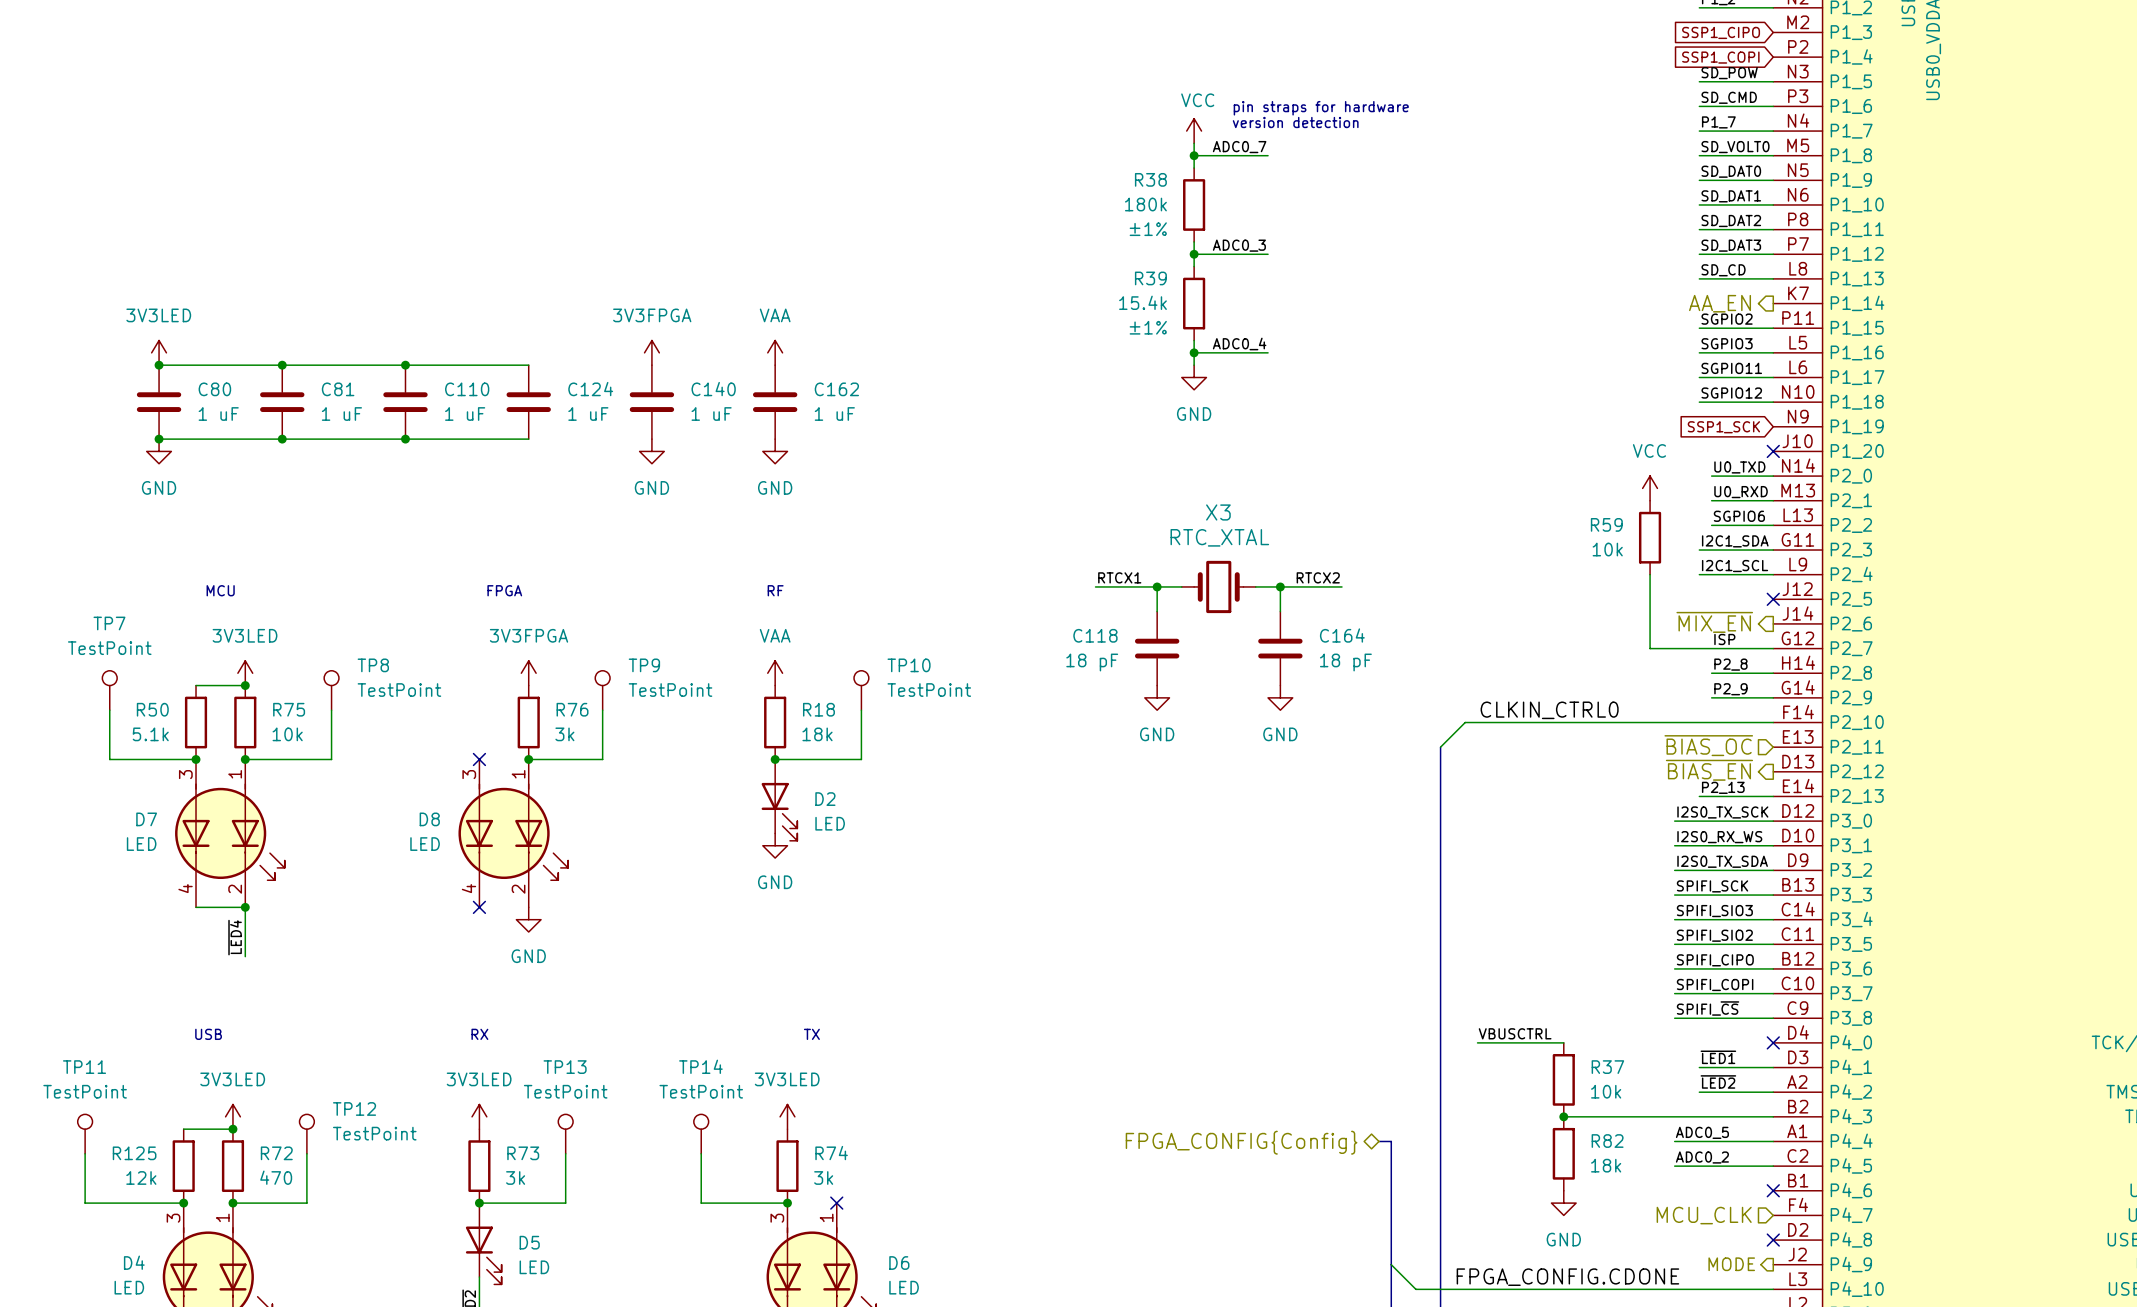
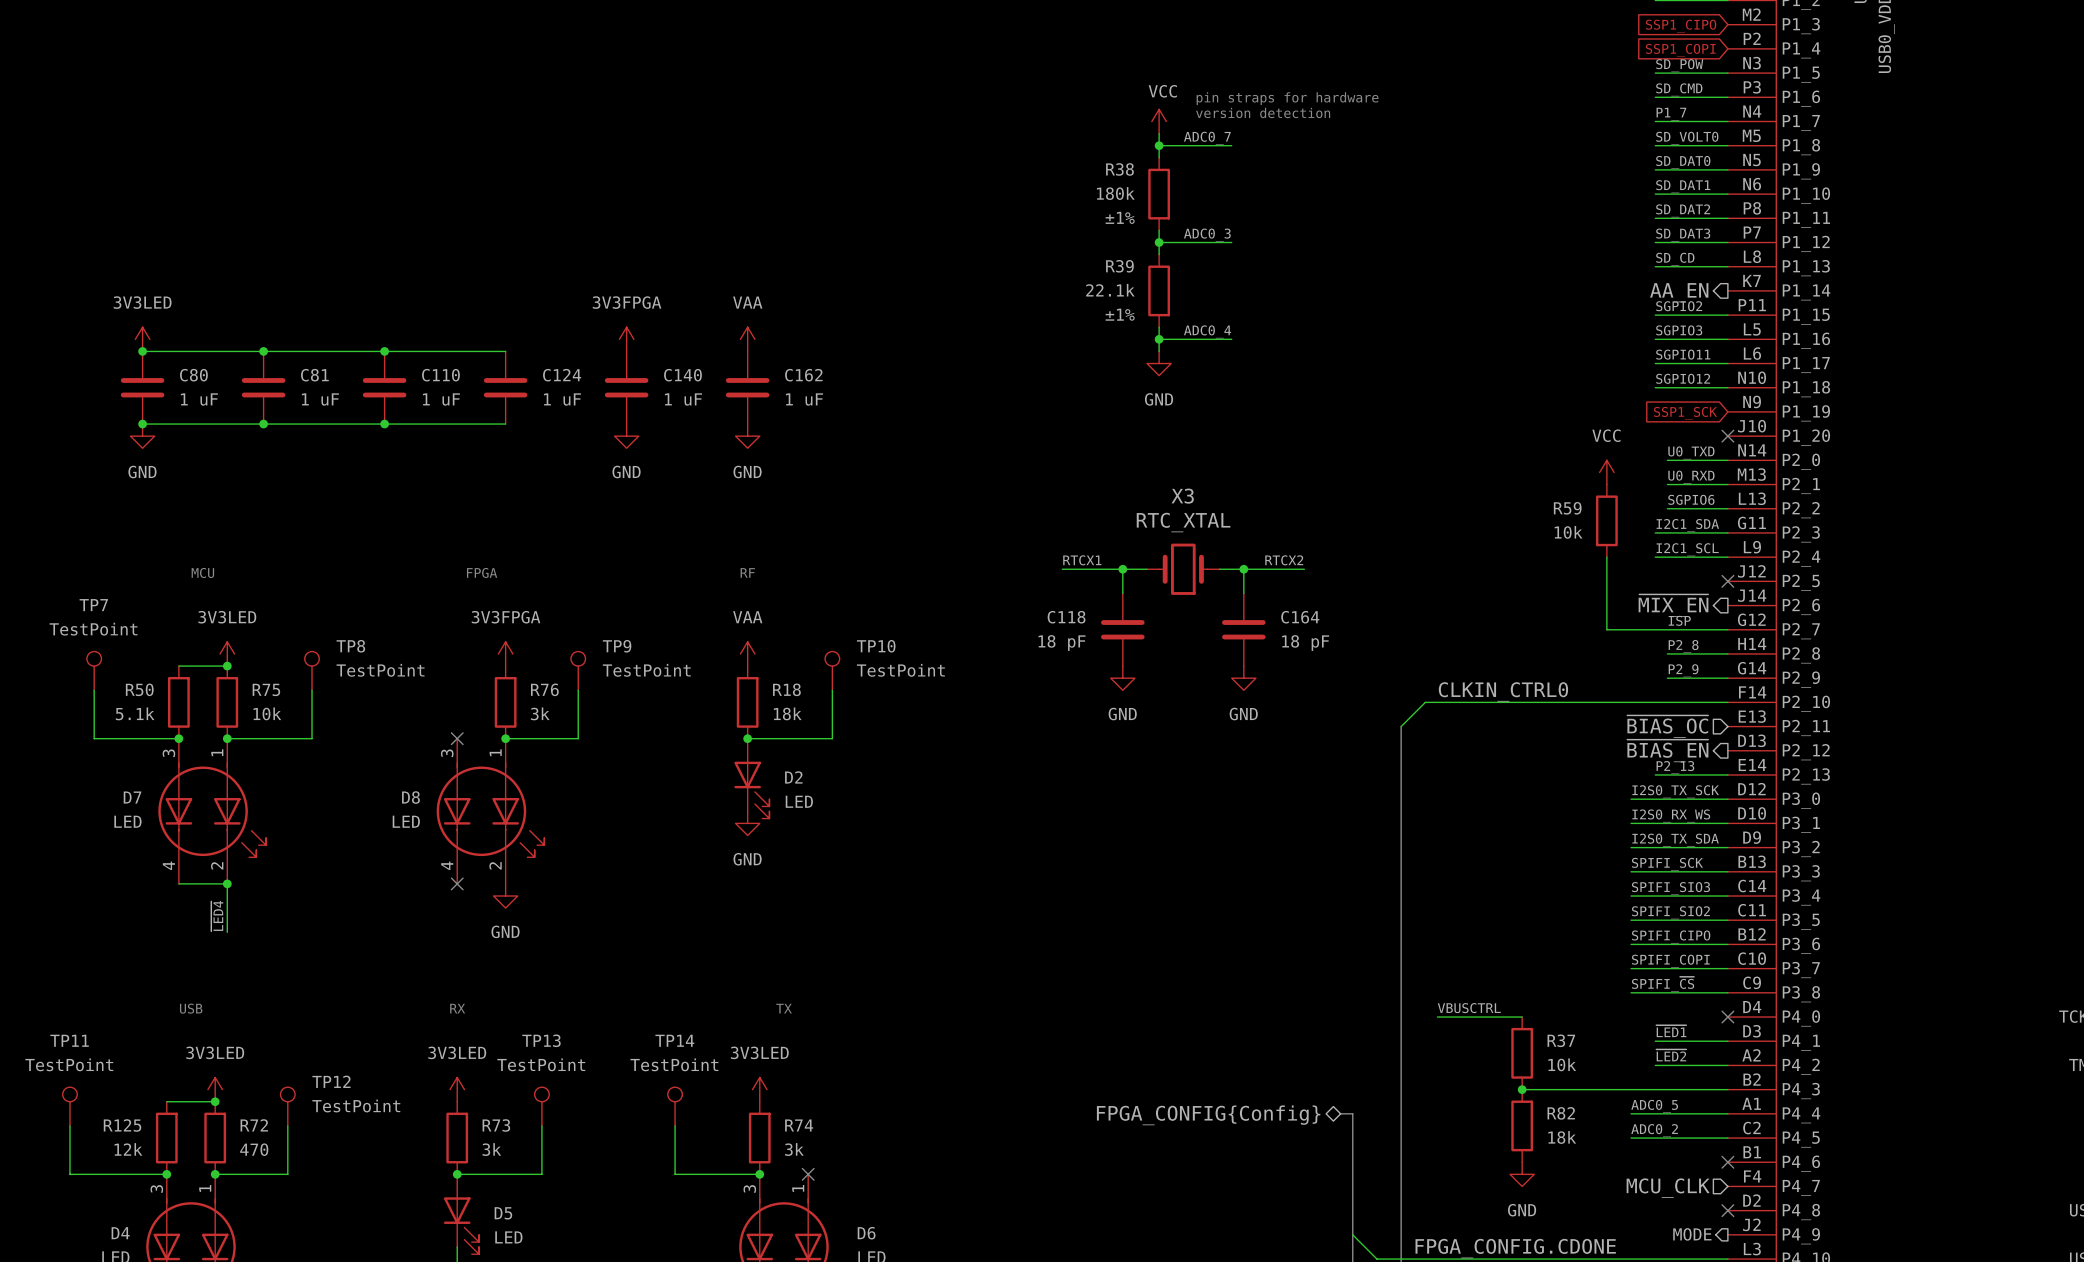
R39 value: 15.4k (1142, 302) -> 22.1k (1110, 290)

